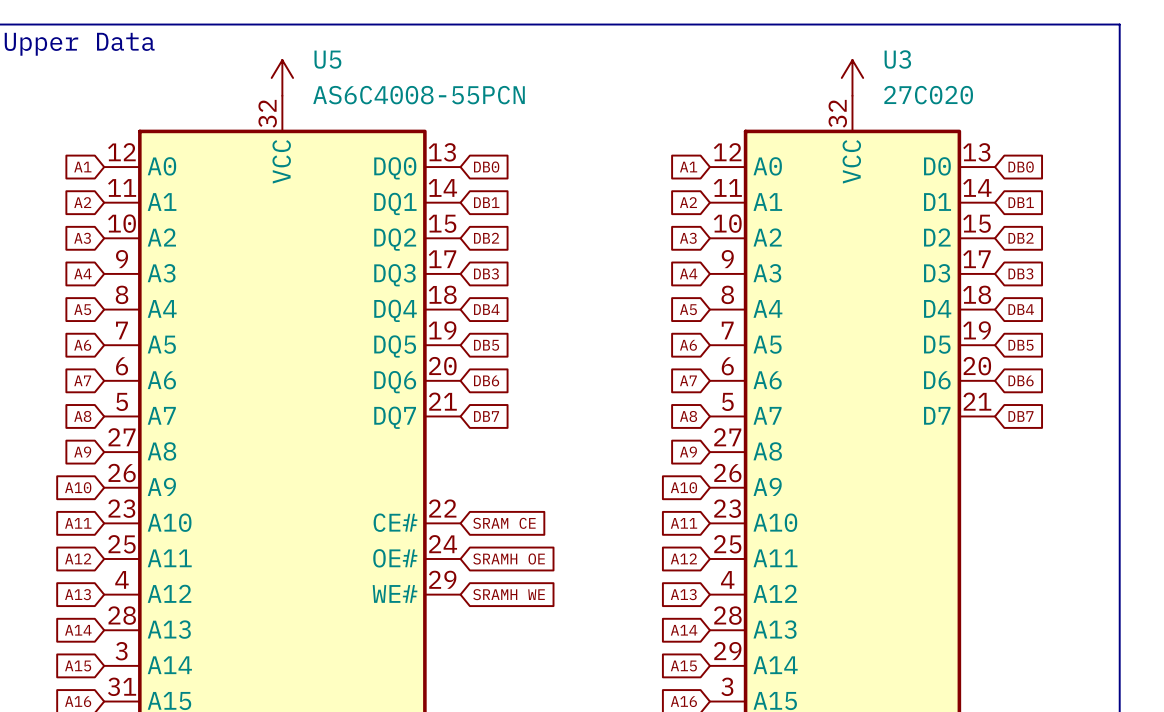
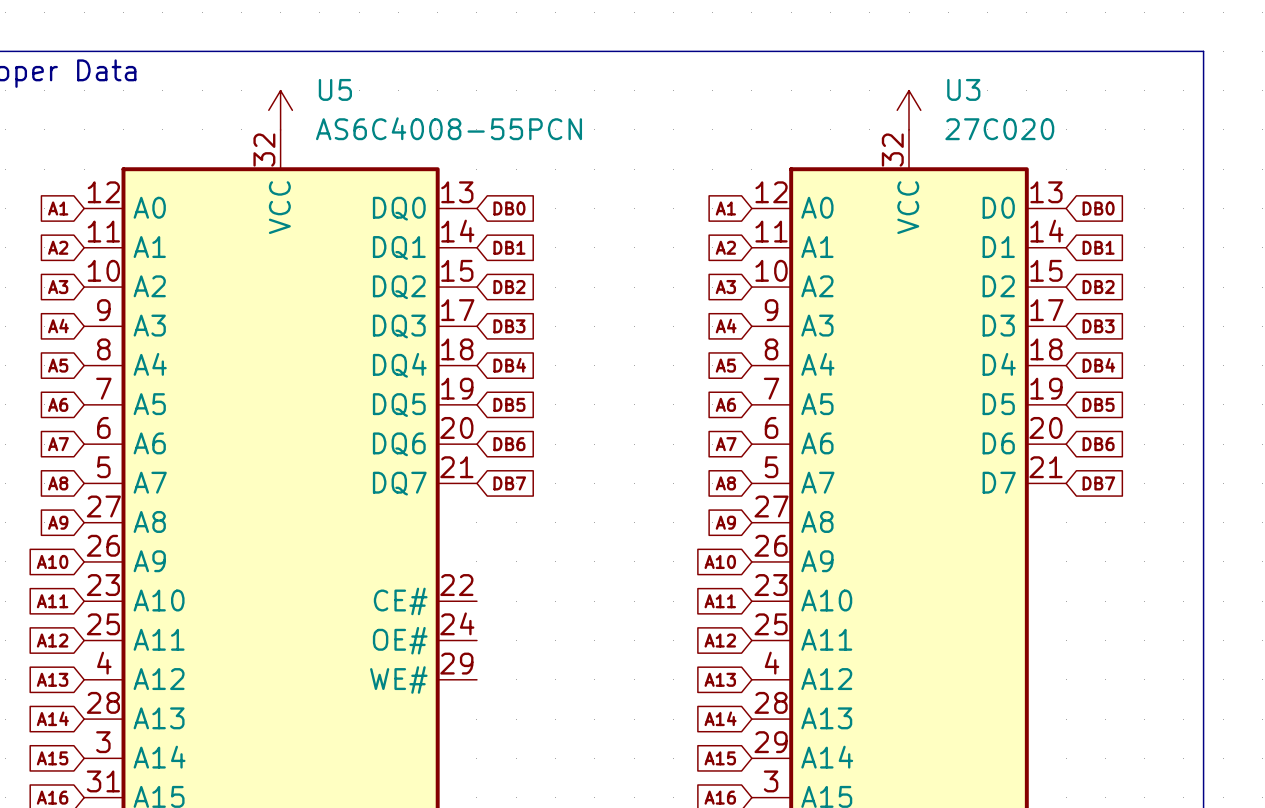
global label: SRAM CE (504, 523) -> none
global label: SRAMH OE (509, 558) -> none
global label: SRAMH WE (509, 594) -> none

